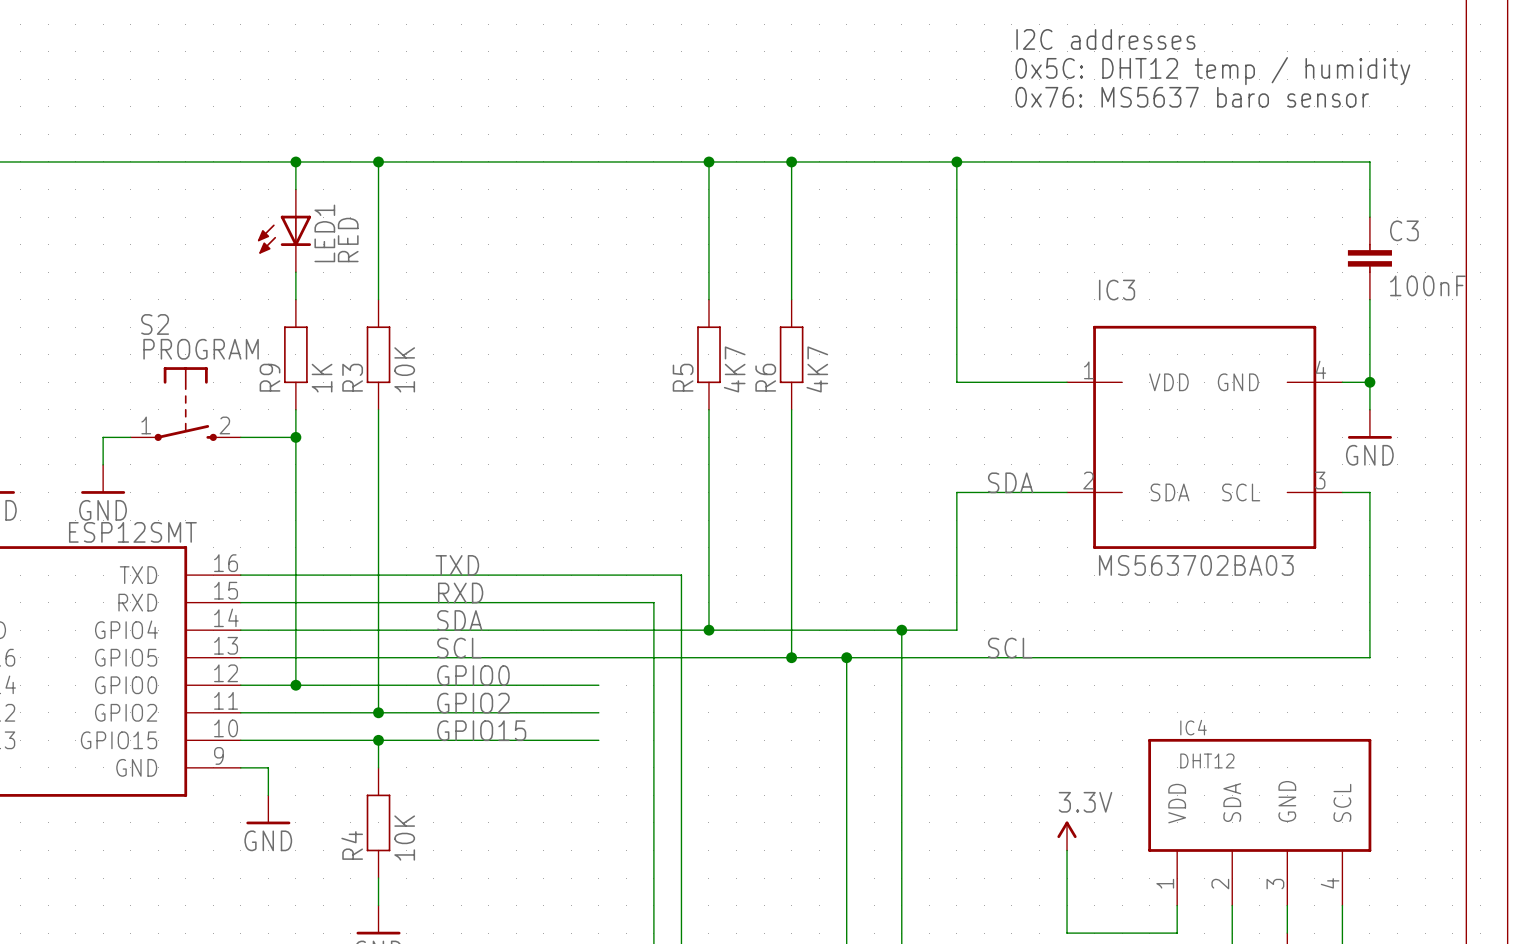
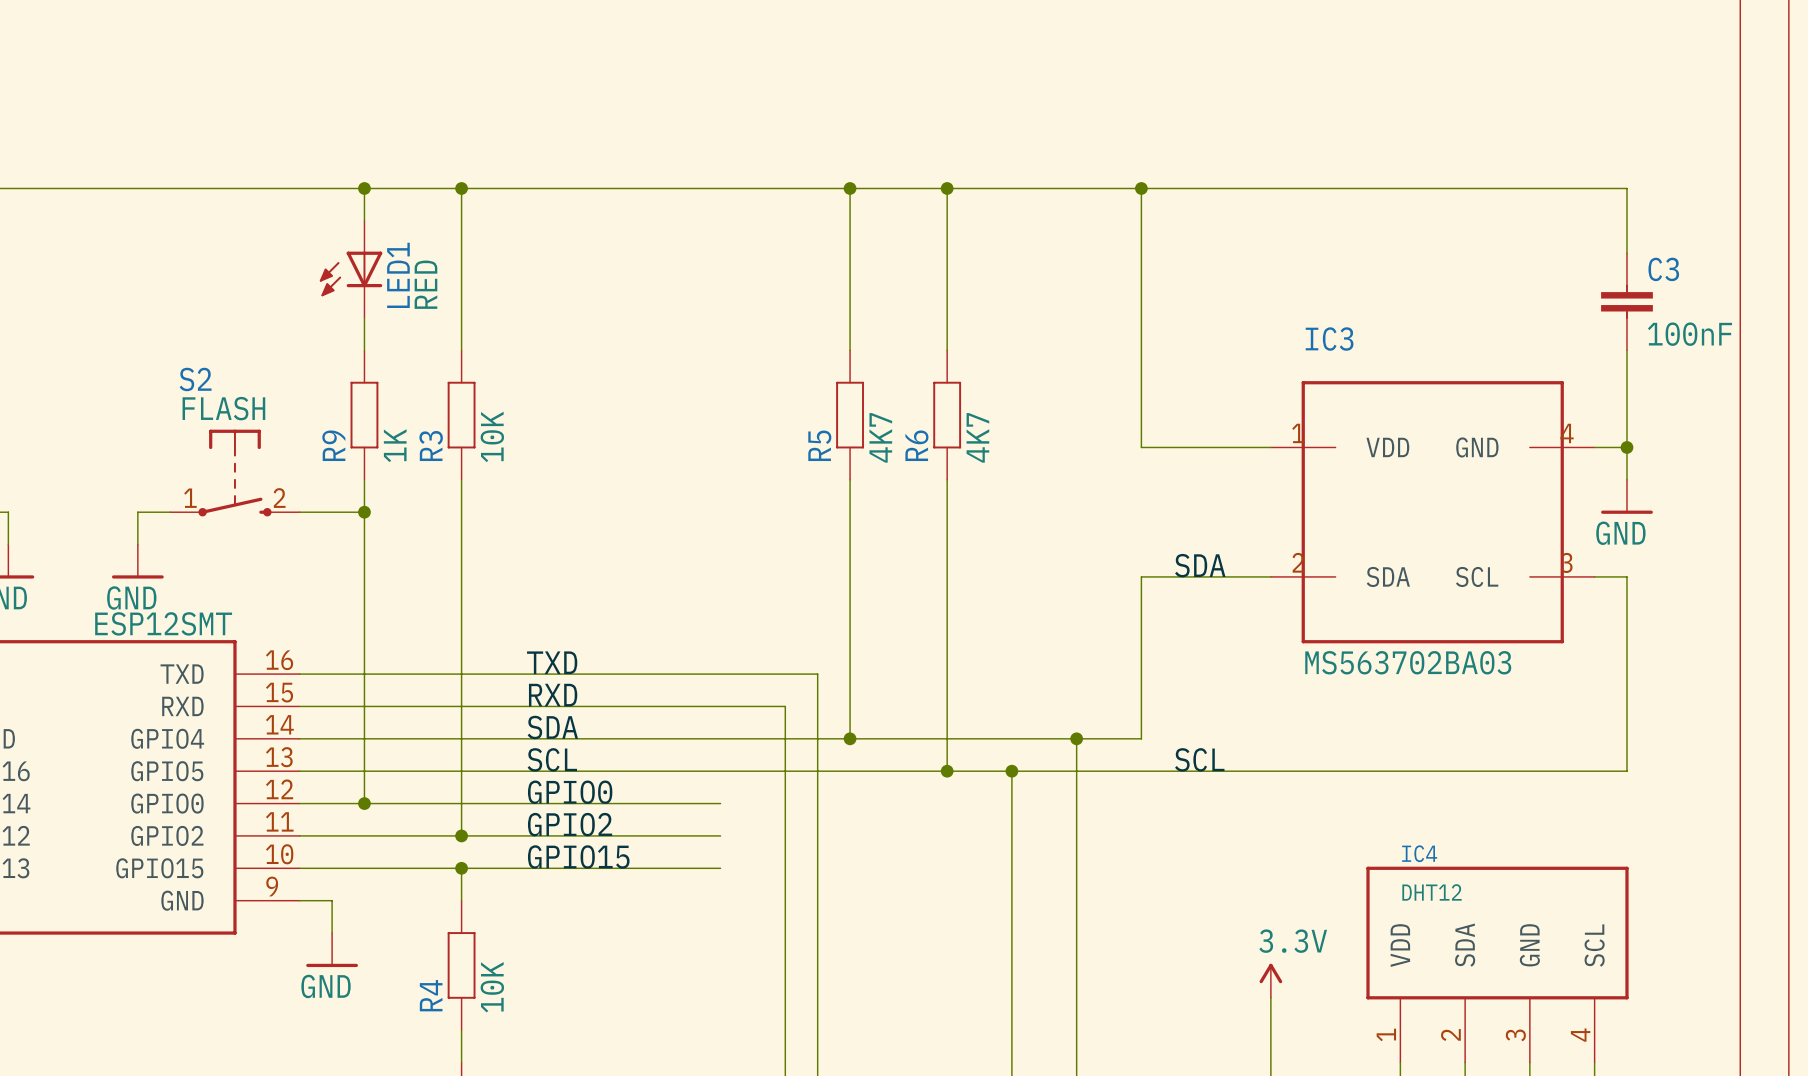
text: I2C addresses (1105, 39) -> none
text: 0x5C: DHT12 temp / humidity (1212, 71) -> none
text: 0x76: MS5637 baro sensor (1192, 97) -> none
S2 value: PROGRAM (201, 349) -> FLASH (223, 408)

